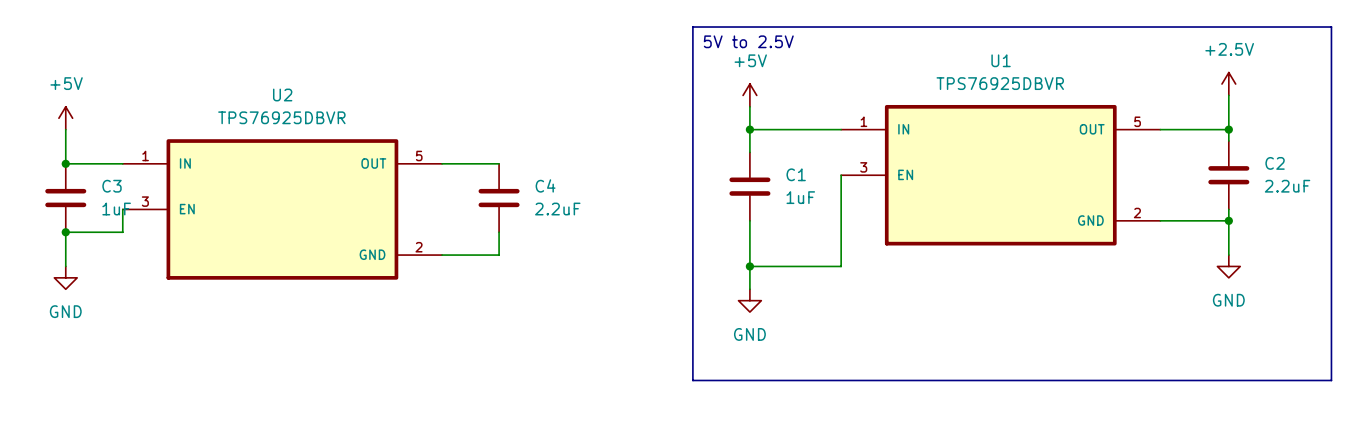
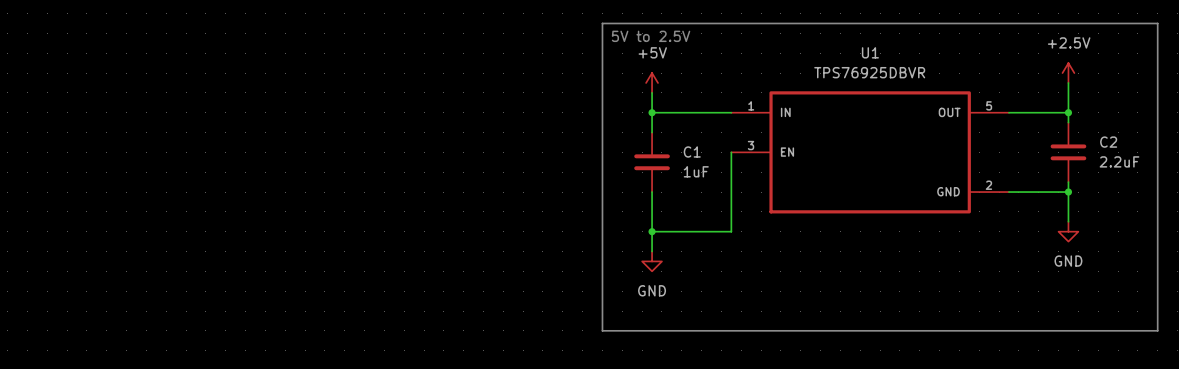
power symbol: +5V (65, 118) -> none
wire: (65, 129) (65, 163) (122, 163) -> none
junction: (65, 163) -> none
wire: (442, 163) (499, 163) -> none
C3: 1uF (65, 198) -> none
C4: 2.2uF (499, 198) -> none
wire: (122, 209) (122, 232) (65, 232) (65, 266) -> none
U2: TPS76925DBVR (282, 209) -> none
junction: (65, 232) -> none
wire: (499, 232) (499, 255) (442, 255) -> none
power symbol: GND (65, 277) -> none

